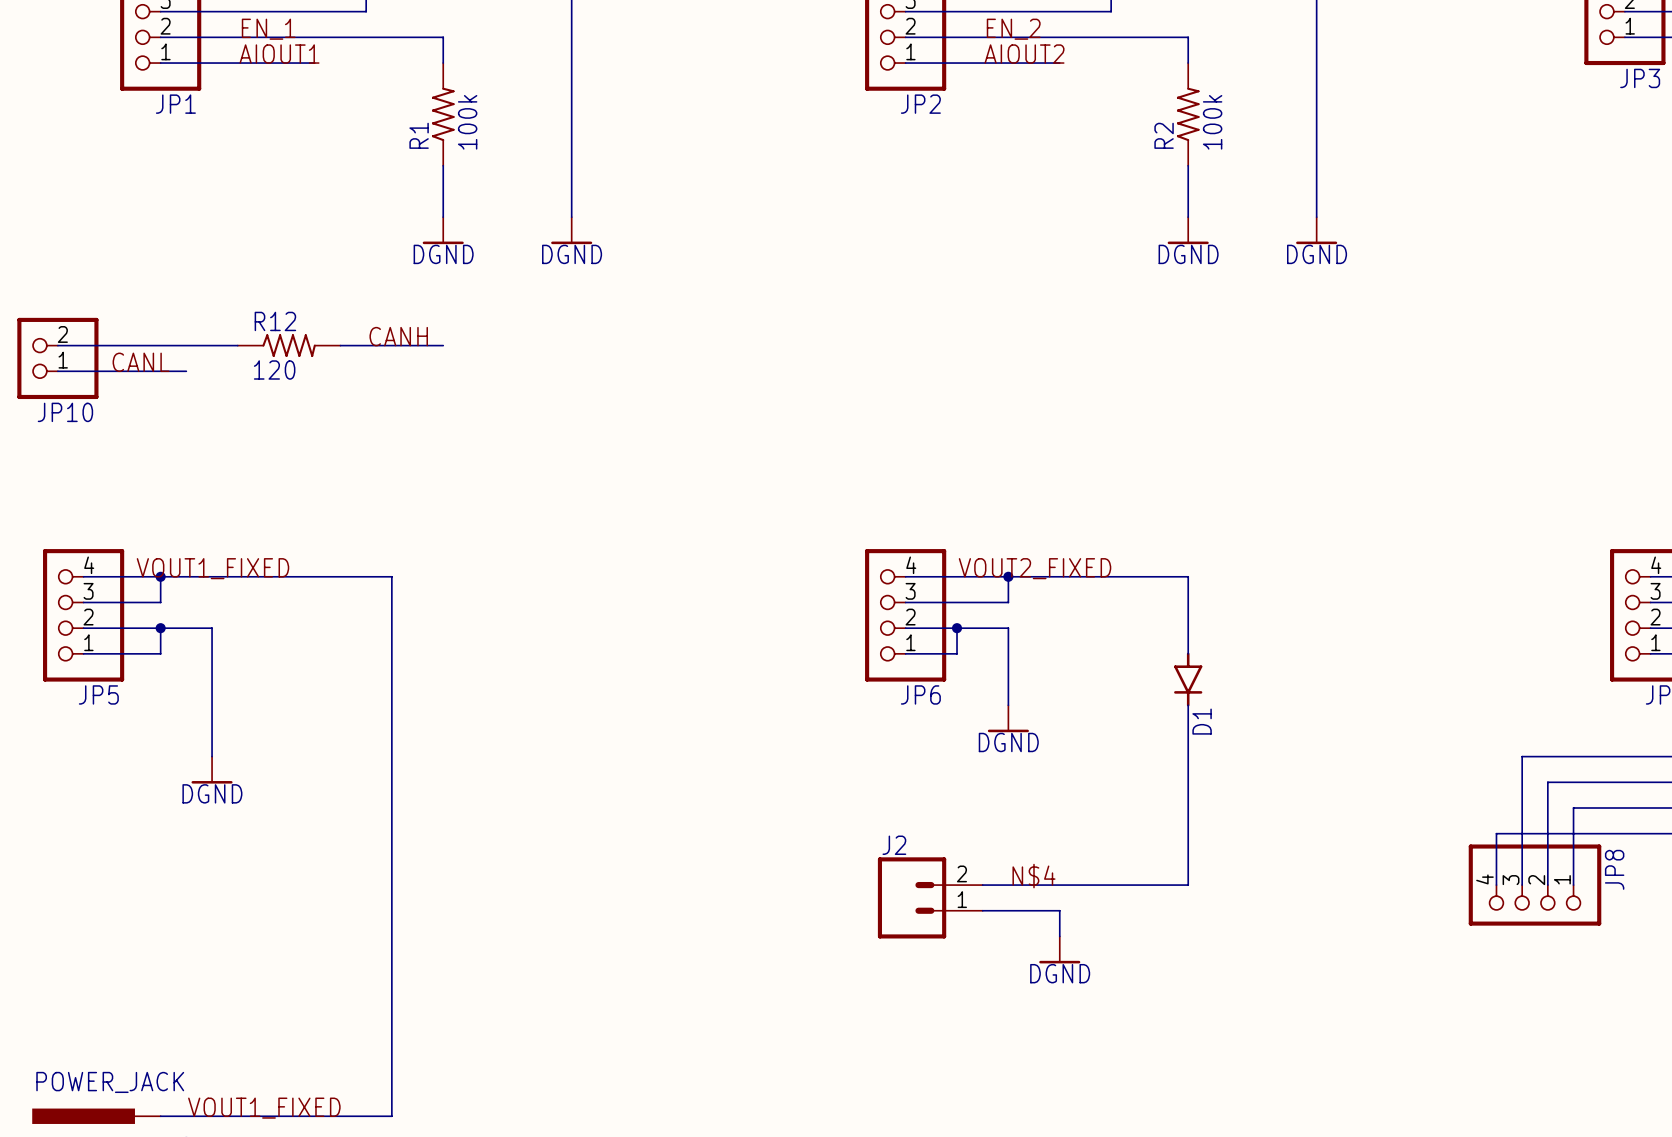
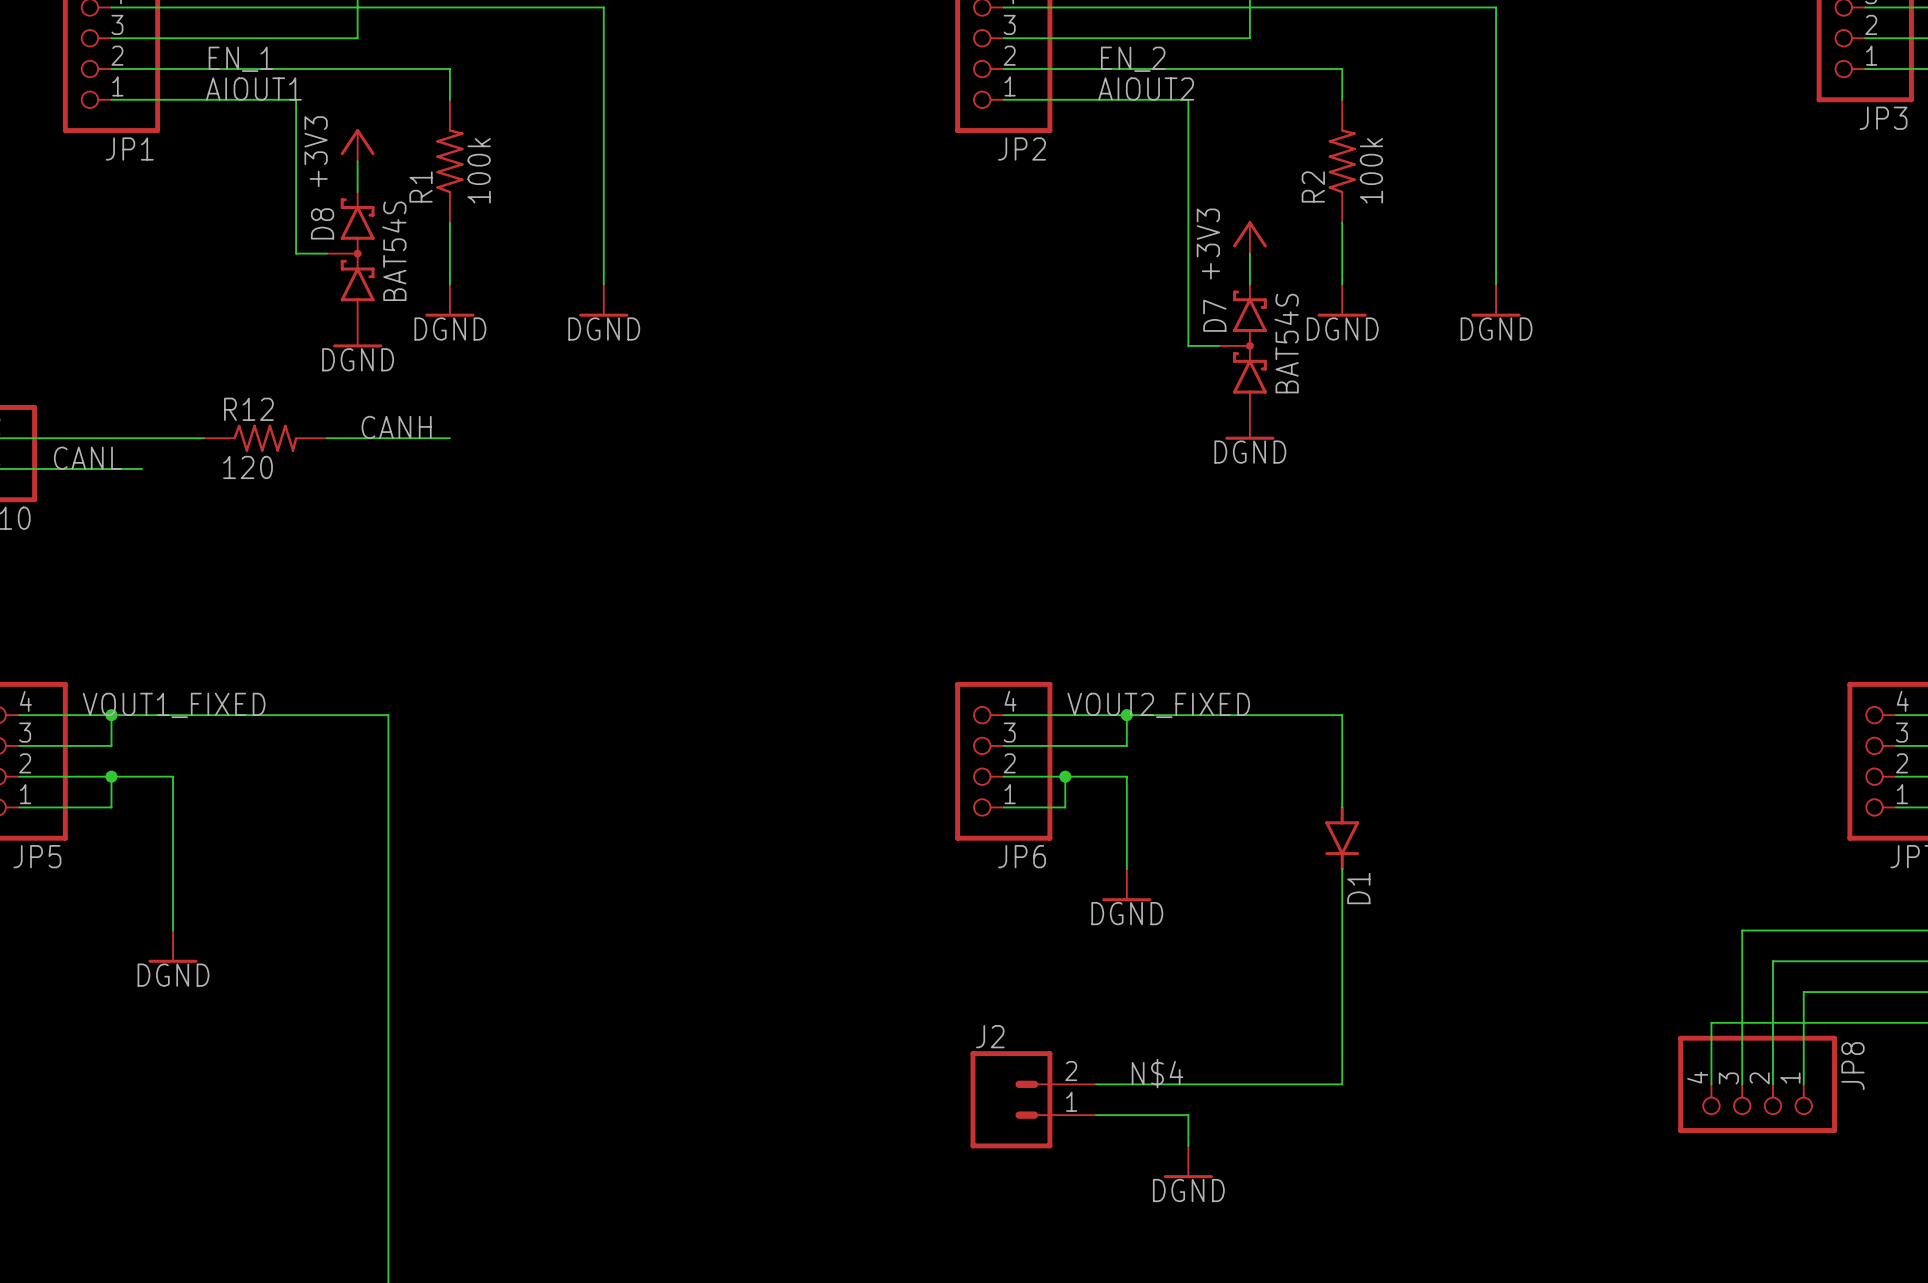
wire: none -> (296, 99) (296, 253) (326, 253)
wire: none -> (1188, 99) (1188, 345) (1219, 345)
power symbol: none -> +3V3 (357, 145)
wire: none -> (357, 161) (357, 192)
power symbol: none -> +3V3 (1249, 237)
D8: none -> BAT54S (350, 253)
wire: none -> (1249, 253) (1249, 284)
power symbol: none -> DGND (357, 331)
D7: none -> BAT54S (1242, 345)
power symbol: none -> DGND (1249, 423)

